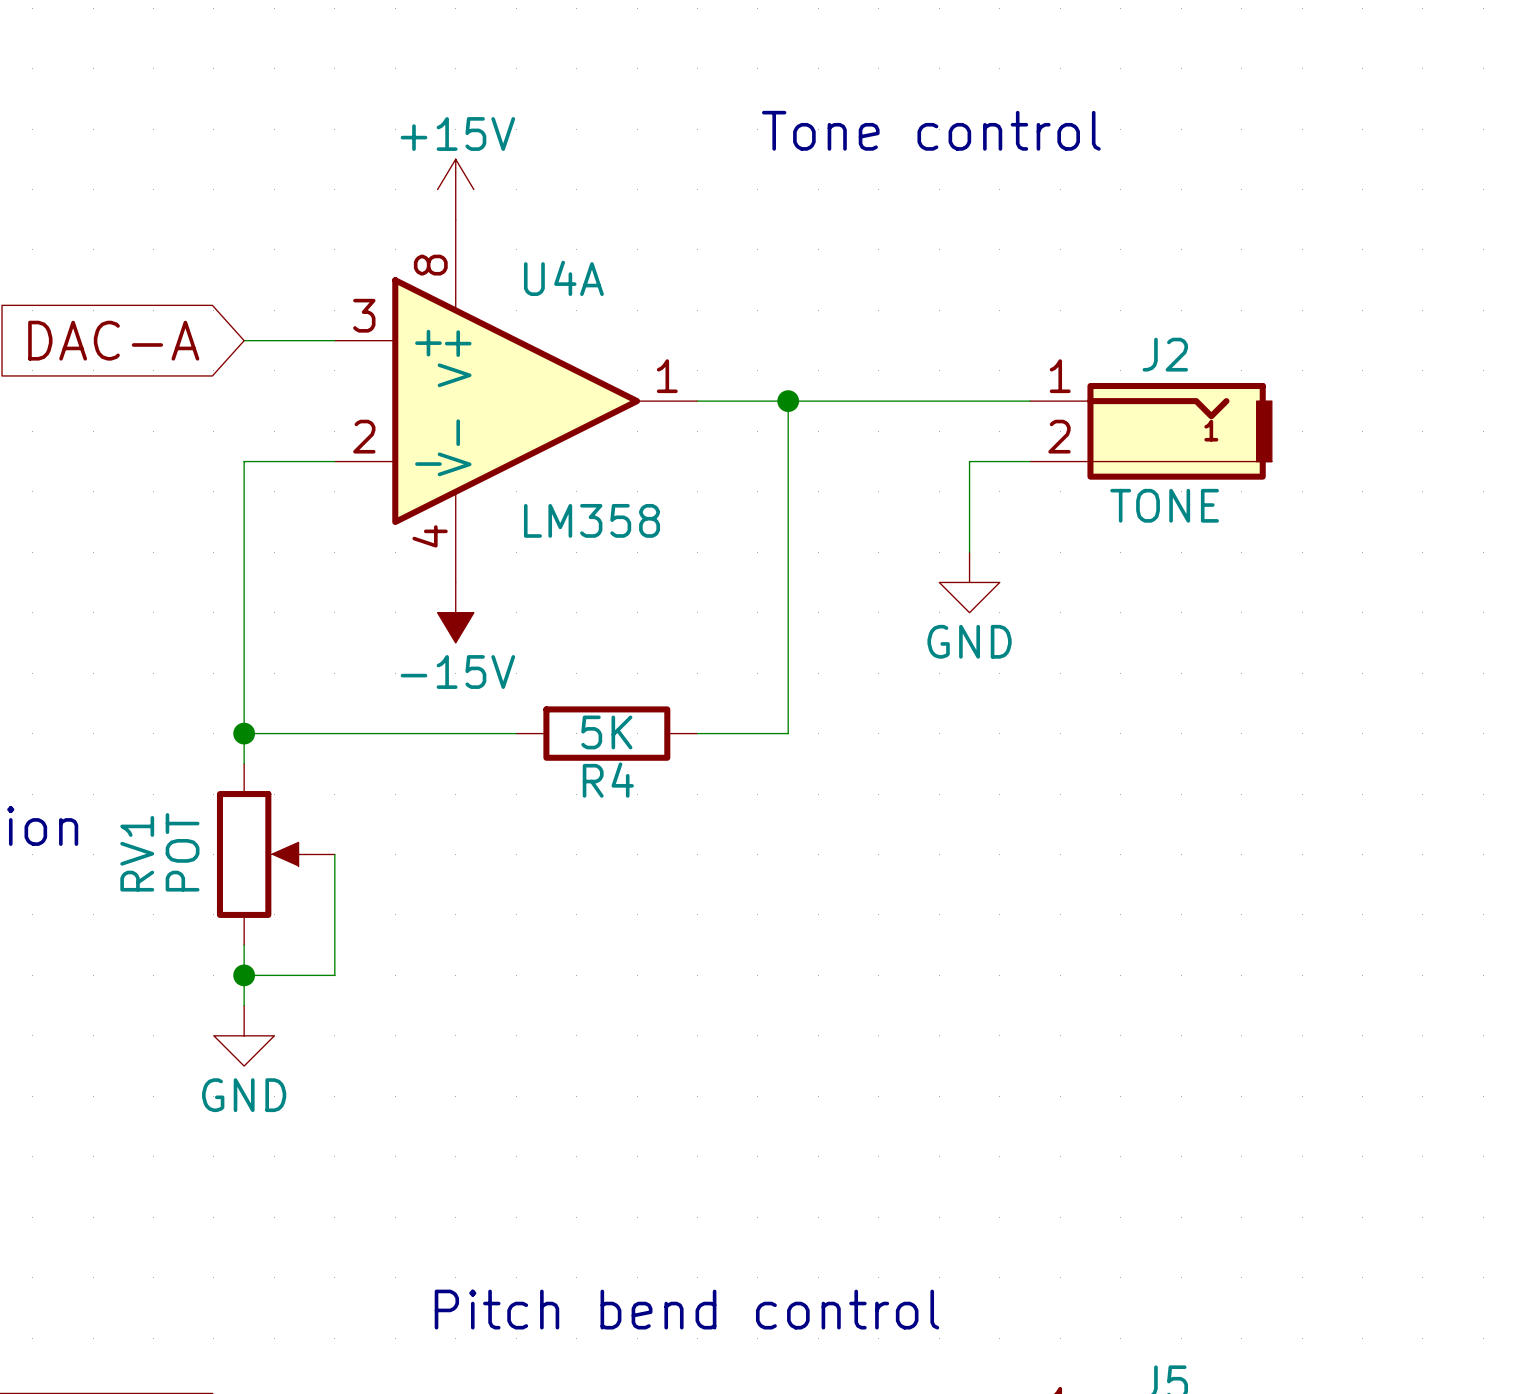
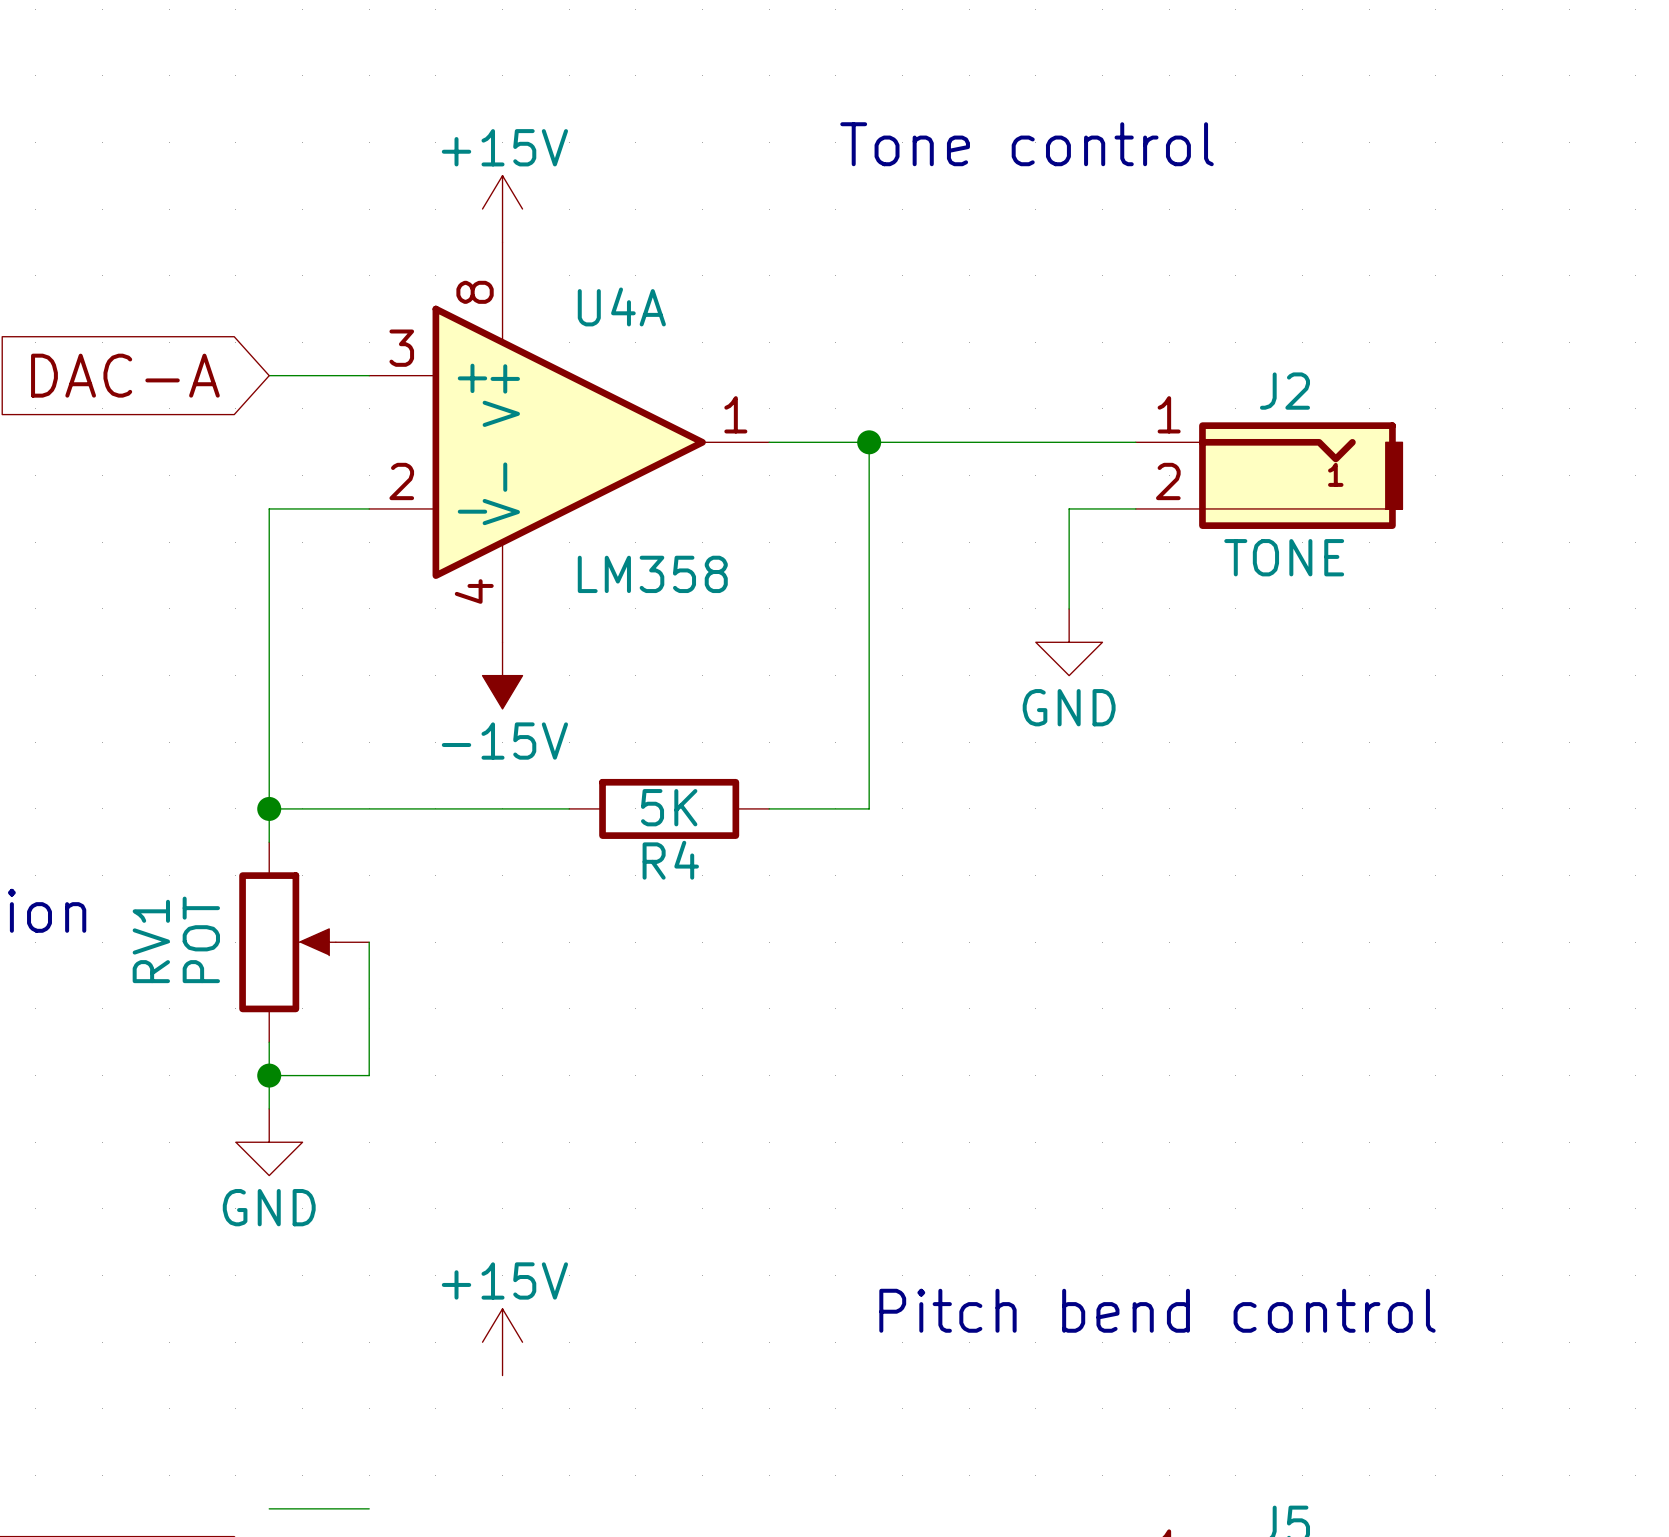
power symbol: none -> +15V (502, 1342)
text position: Pitch bend control (686, 1309) -> Pitch bend control (1157, 1310)
wire: none -> (269, 1508) (369, 1508)

